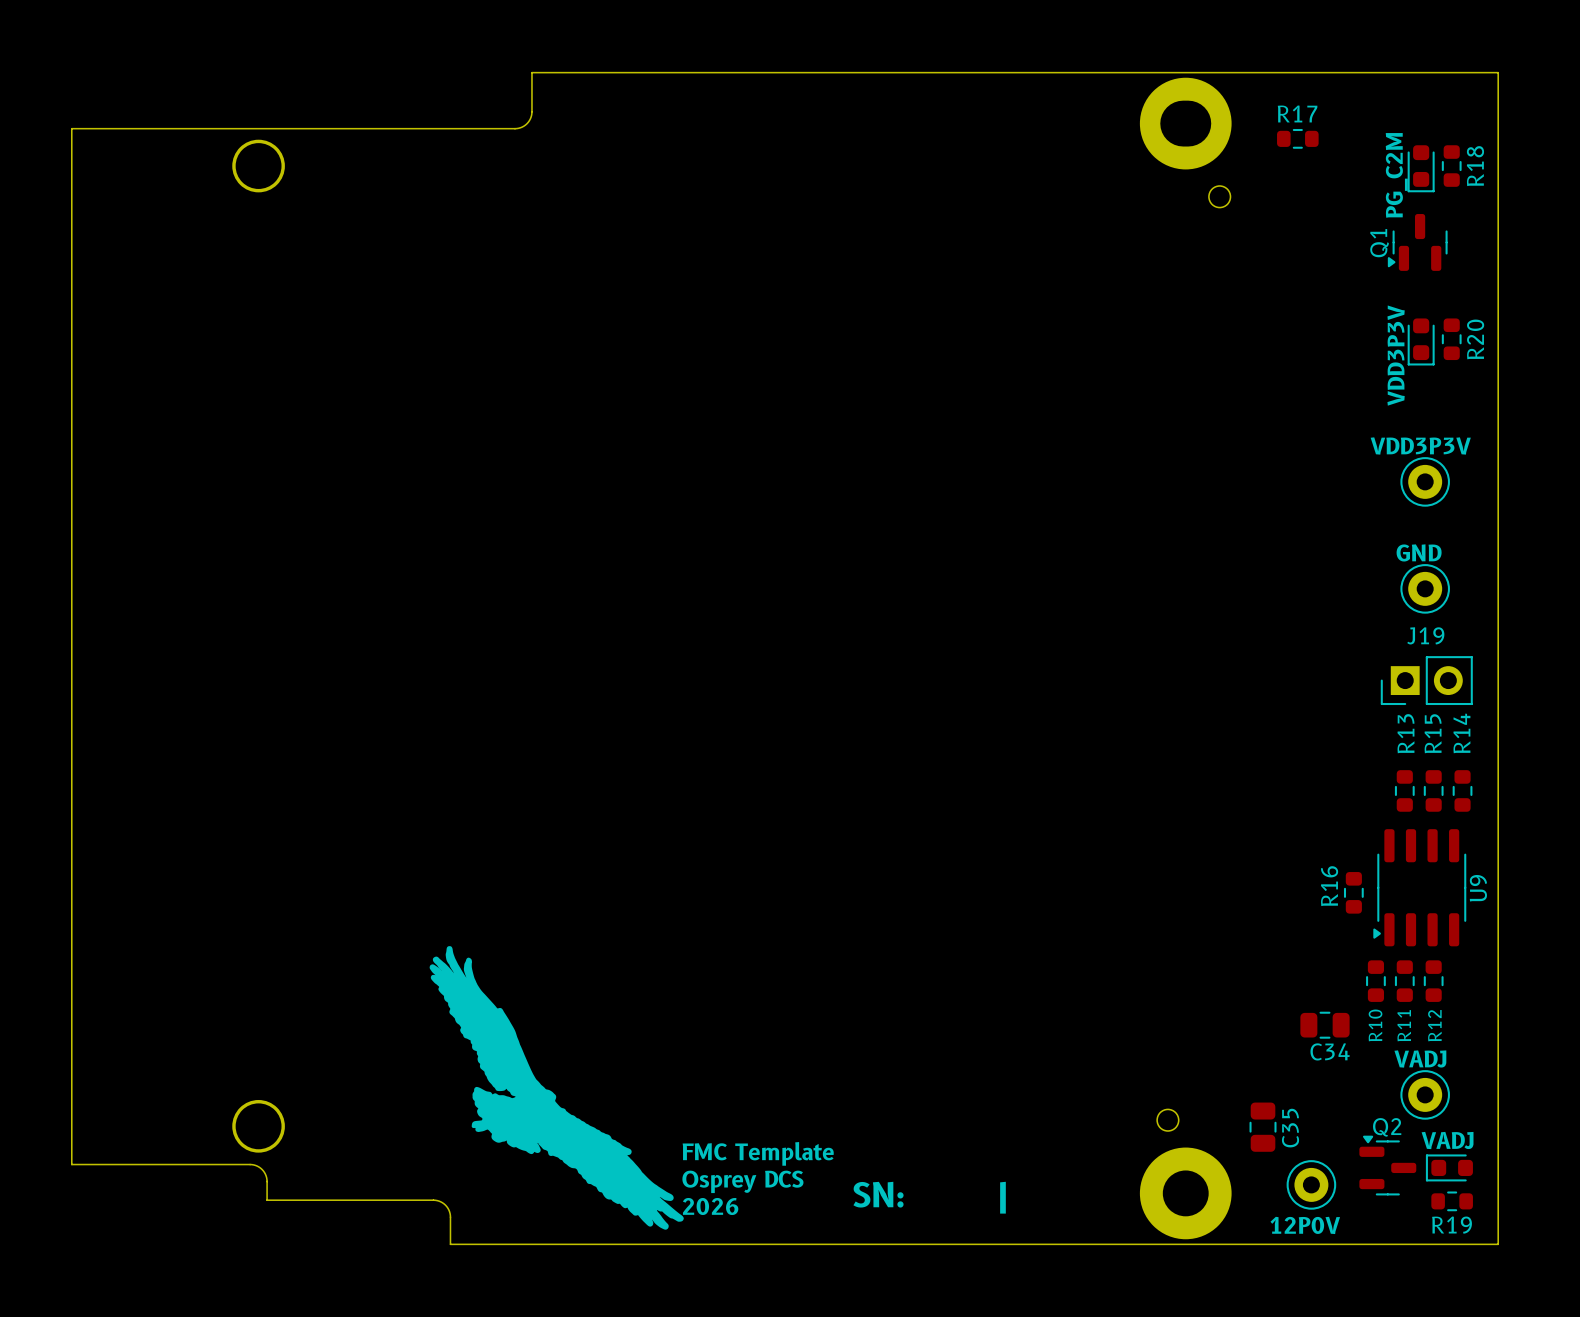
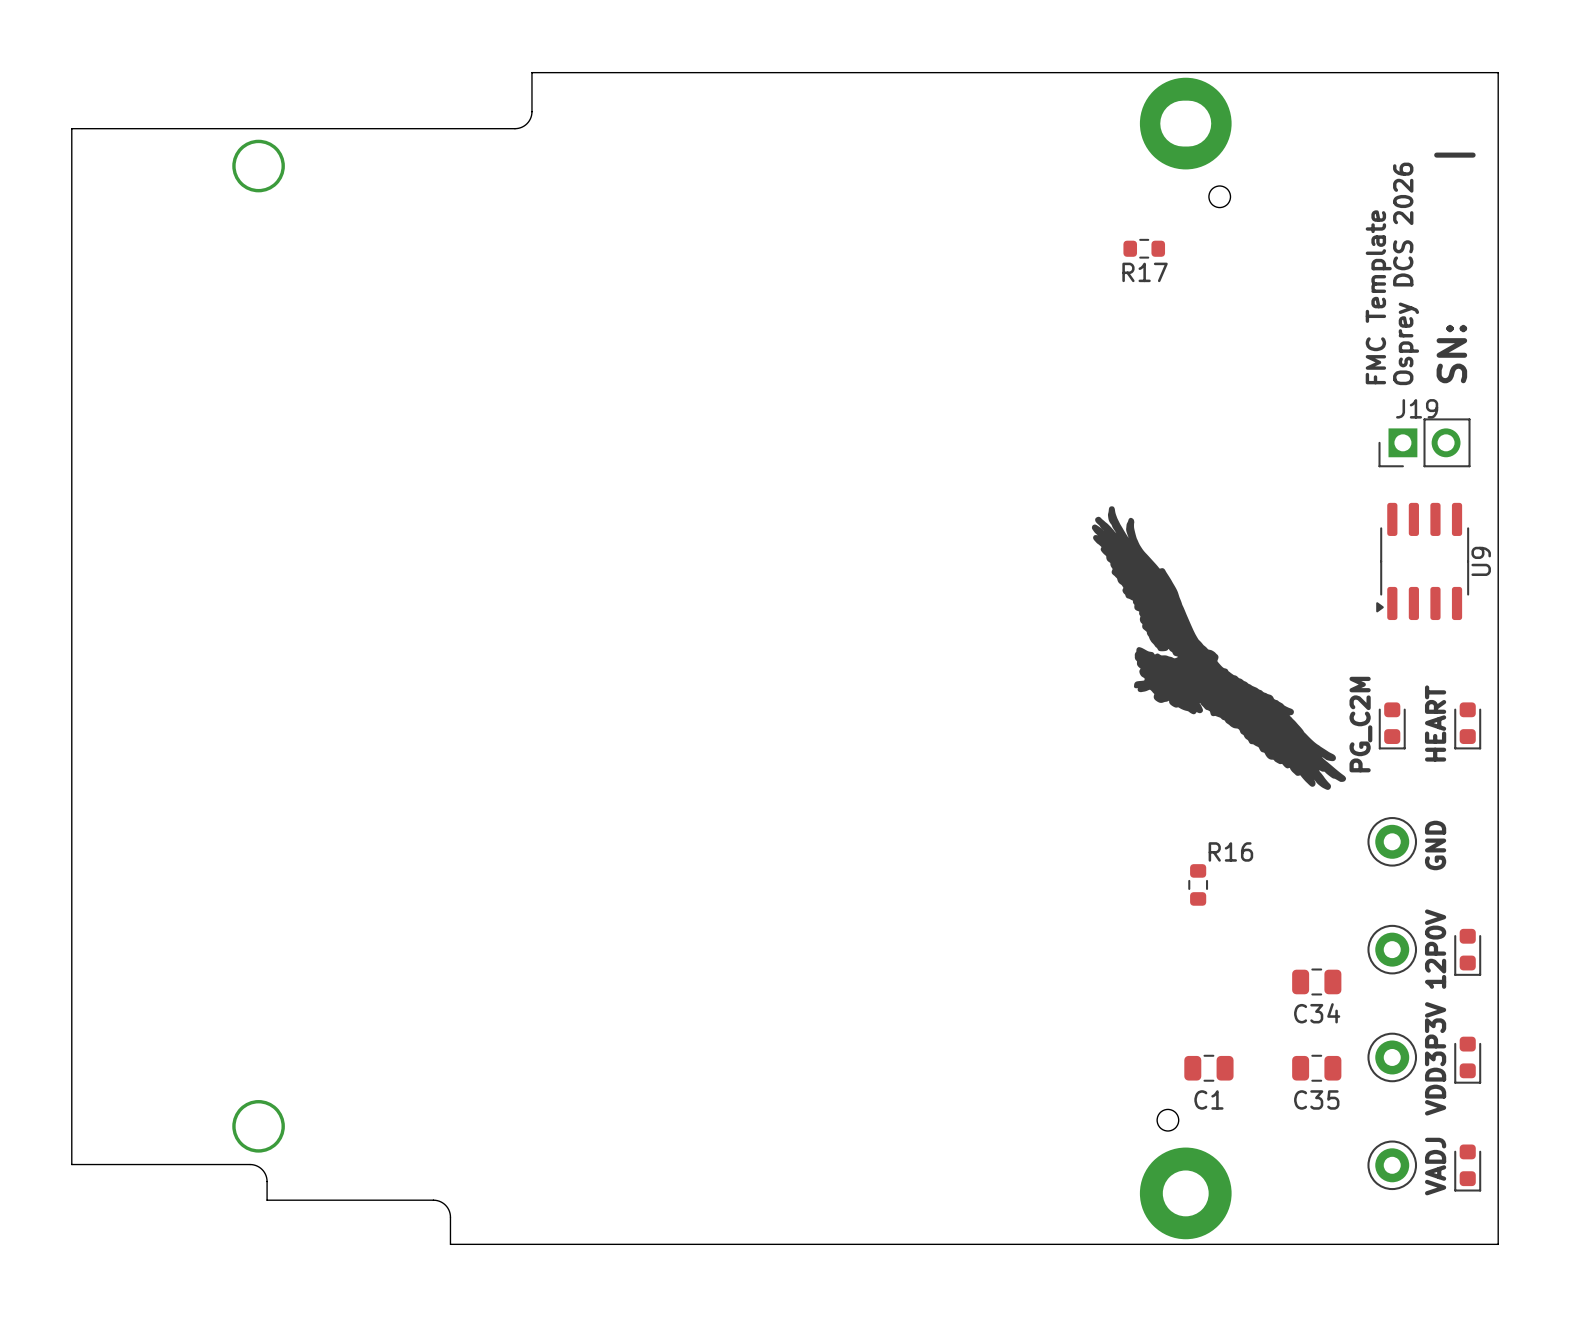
R17 name position: R17 (1297, 113) -> R17 (1145, 272)
R17 position: (1297, 138) -> (1144, 248)
R18: (1451, 166) -> none
part: (1421, 168) -> none
text: PG_C2M (1396, 175) -> none
Q1: (1417, 242) -> none
text: none -> Osprey DCS 2026 (1406, 273)
text: none -> FMC Template (1378, 297)
text: none -> SN: | (1454, 267)
R20: (1451, 339) -> none
part: (1421, 341) -> none
text: VDD3P3V (1396, 355) -> none
text: VDD3P3V (1420, 445) -> none
part: (1425, 481) -> none
drawing: none -> [1091, 506, 1347, 790]
text rotation: 0° (1419, 552) -> 90° counterclockwise (1435, 845)
text position: GND (1419, 552) -> GND (1435, 845)
part: (1425, 588) -> none
J19 name position: J19 (1425, 635) -> J19 (1417, 408)
J19 position: (1426, 680) -> (1424, 442)
part: none -> (1392, 725)
part: none -> (1467, 725)
text: none -> HEART (1435, 723)
text: none -> PG_C2M (1360, 724)
R13: (1404, 790) -> none
R15: (1433, 790) -> none
R14: (1462, 790) -> none
part: none -> (1392, 841)
R16 name rotation: 0° (1329, 886) -> 90° clockwise (1230, 851)
R16 name position: R16 (1329, 886) -> R16 (1230, 851)
U9 position: (1419, 887) -> (1422, 561)
R16 position: (1353, 892) -> (1198, 884)
drawing: [429, 946, 684, 1230] -> none
part: none -> (1392, 949)
part: none -> (1467, 952)
R10: (1375, 981) -> none
R11: (1404, 981) -> none
R12: (1433, 981) -> none
C34 position: (1324, 1025) -> (1316, 981)
C34 name position: C34 (1330, 1051) -> C34 (1317, 1013)
part: none -> (1392, 1057)
text: VADJ (1420, 1059) -> none
part: none -> (1467, 1060)
text: none -> VDD3P3V (1435, 1058)
C1: none -> (1208, 1068)
part: (1425, 1094) -> none
C35 rotation: 0° (1263, 1127) -> 90° clockwise (1316, 1068)
C35 position: (1263, 1127) -> (1316, 1068)
text rotation: 0° (1447, 1140) -> 90° counterclockwise (1435, 1166)
text: FMC Template (758, 1153) -> none
Q2: (1387, 1165) -> none
part: none -> (1392, 1165)
part rotation: 0° (1449, 1167) -> 90° counterclockwise (1467, 1168)
text: Osprey DCS (742, 1181) -> none
part: (1311, 1184) -> none
text: SN: | (929, 1197) -> none
R19: (1452, 1201) -> none
text: 2026 (710, 1206) -> none
text rotation: 0° (1305, 1225) -> 90° counterclockwise (1435, 949)
text position: 12P0V (1305, 1225) -> 12P0V (1435, 949)

